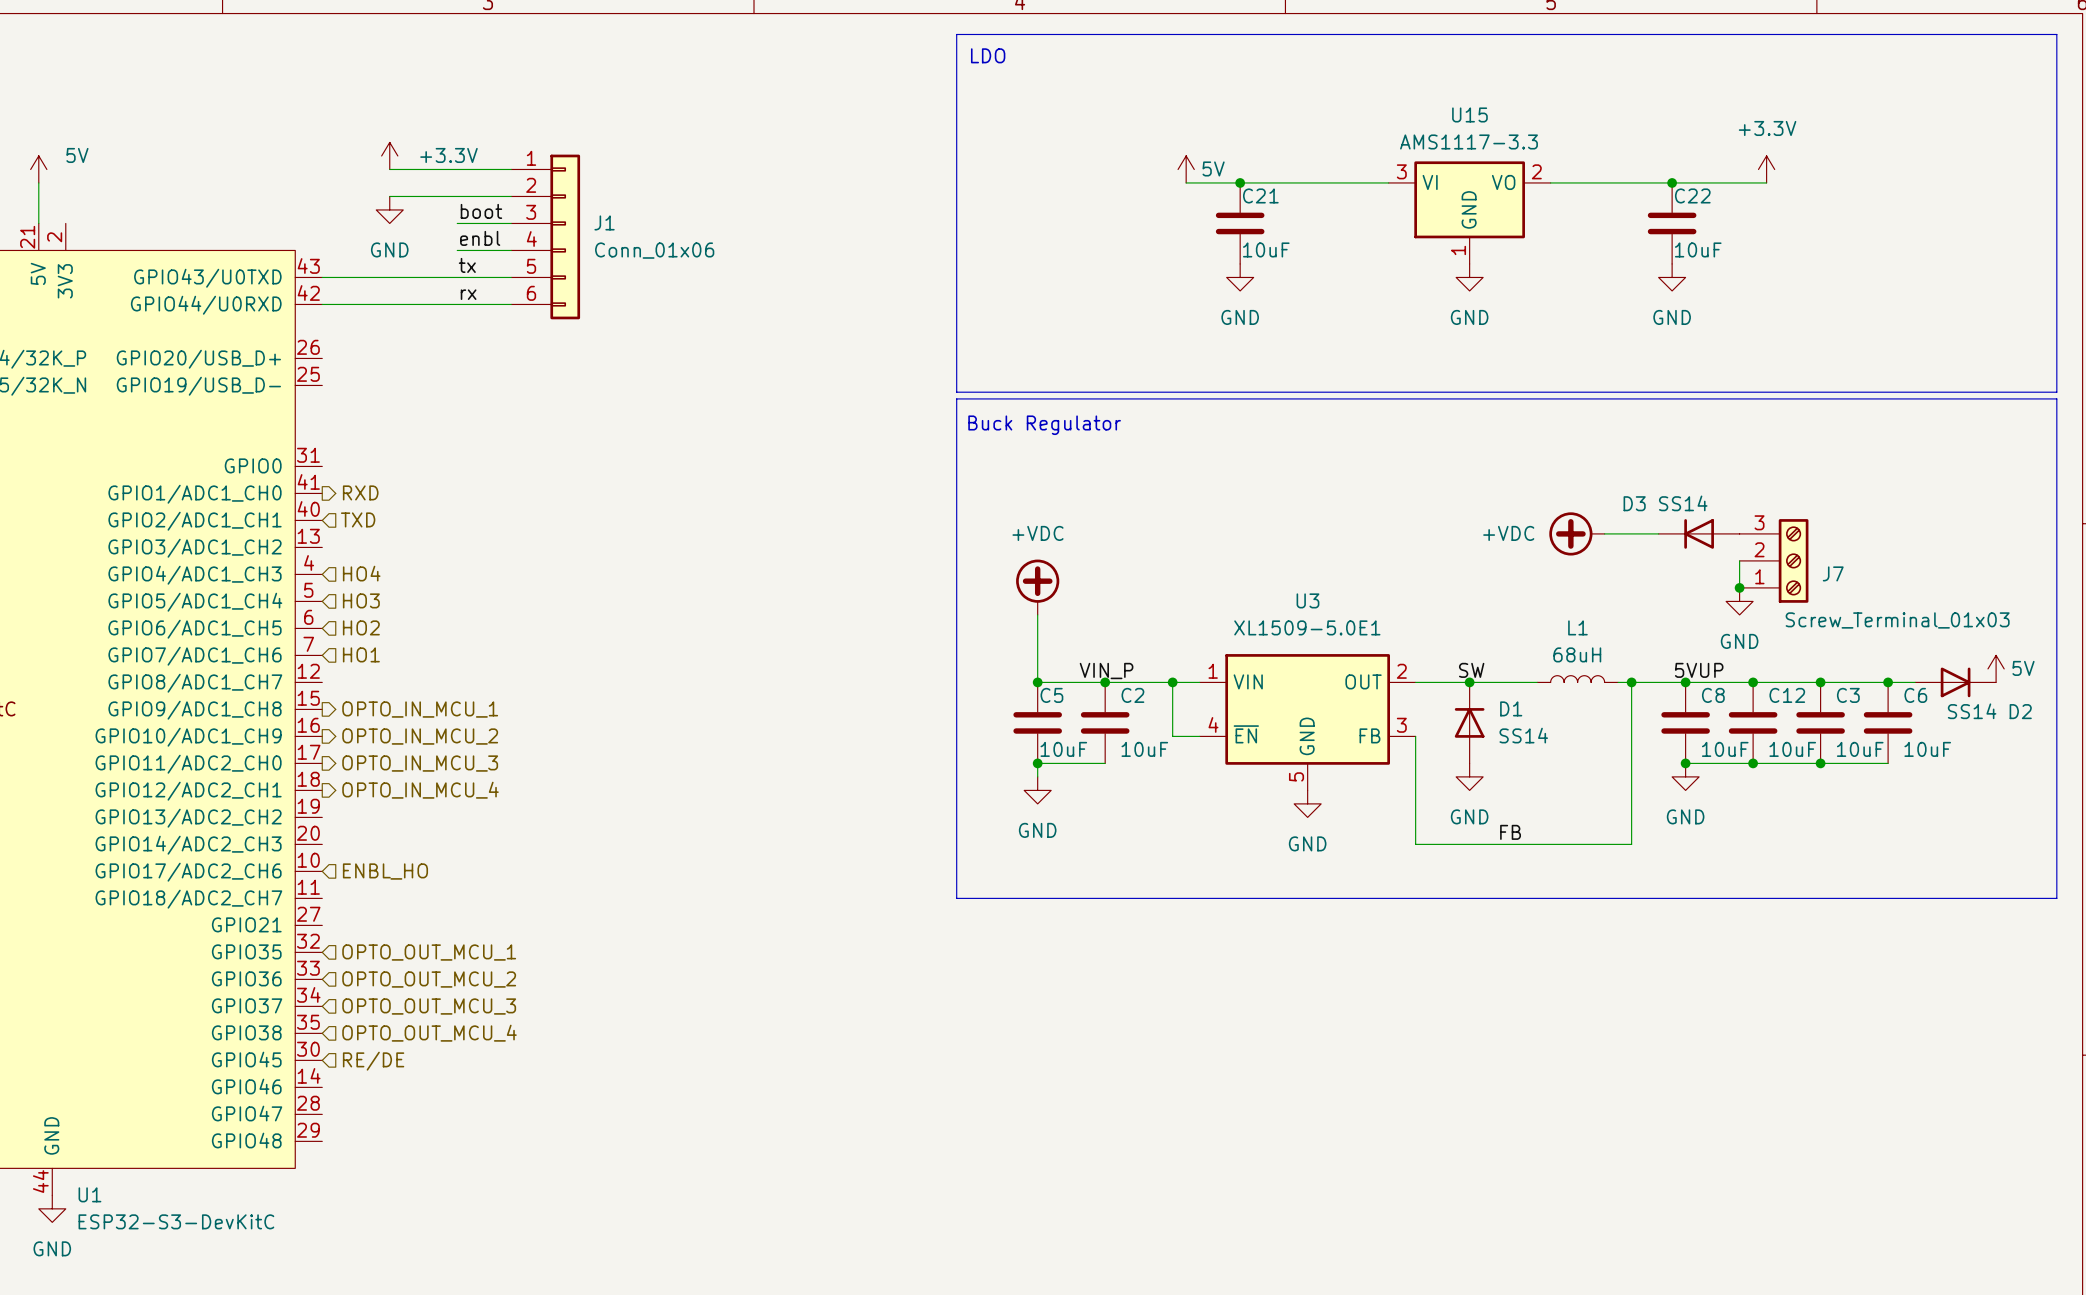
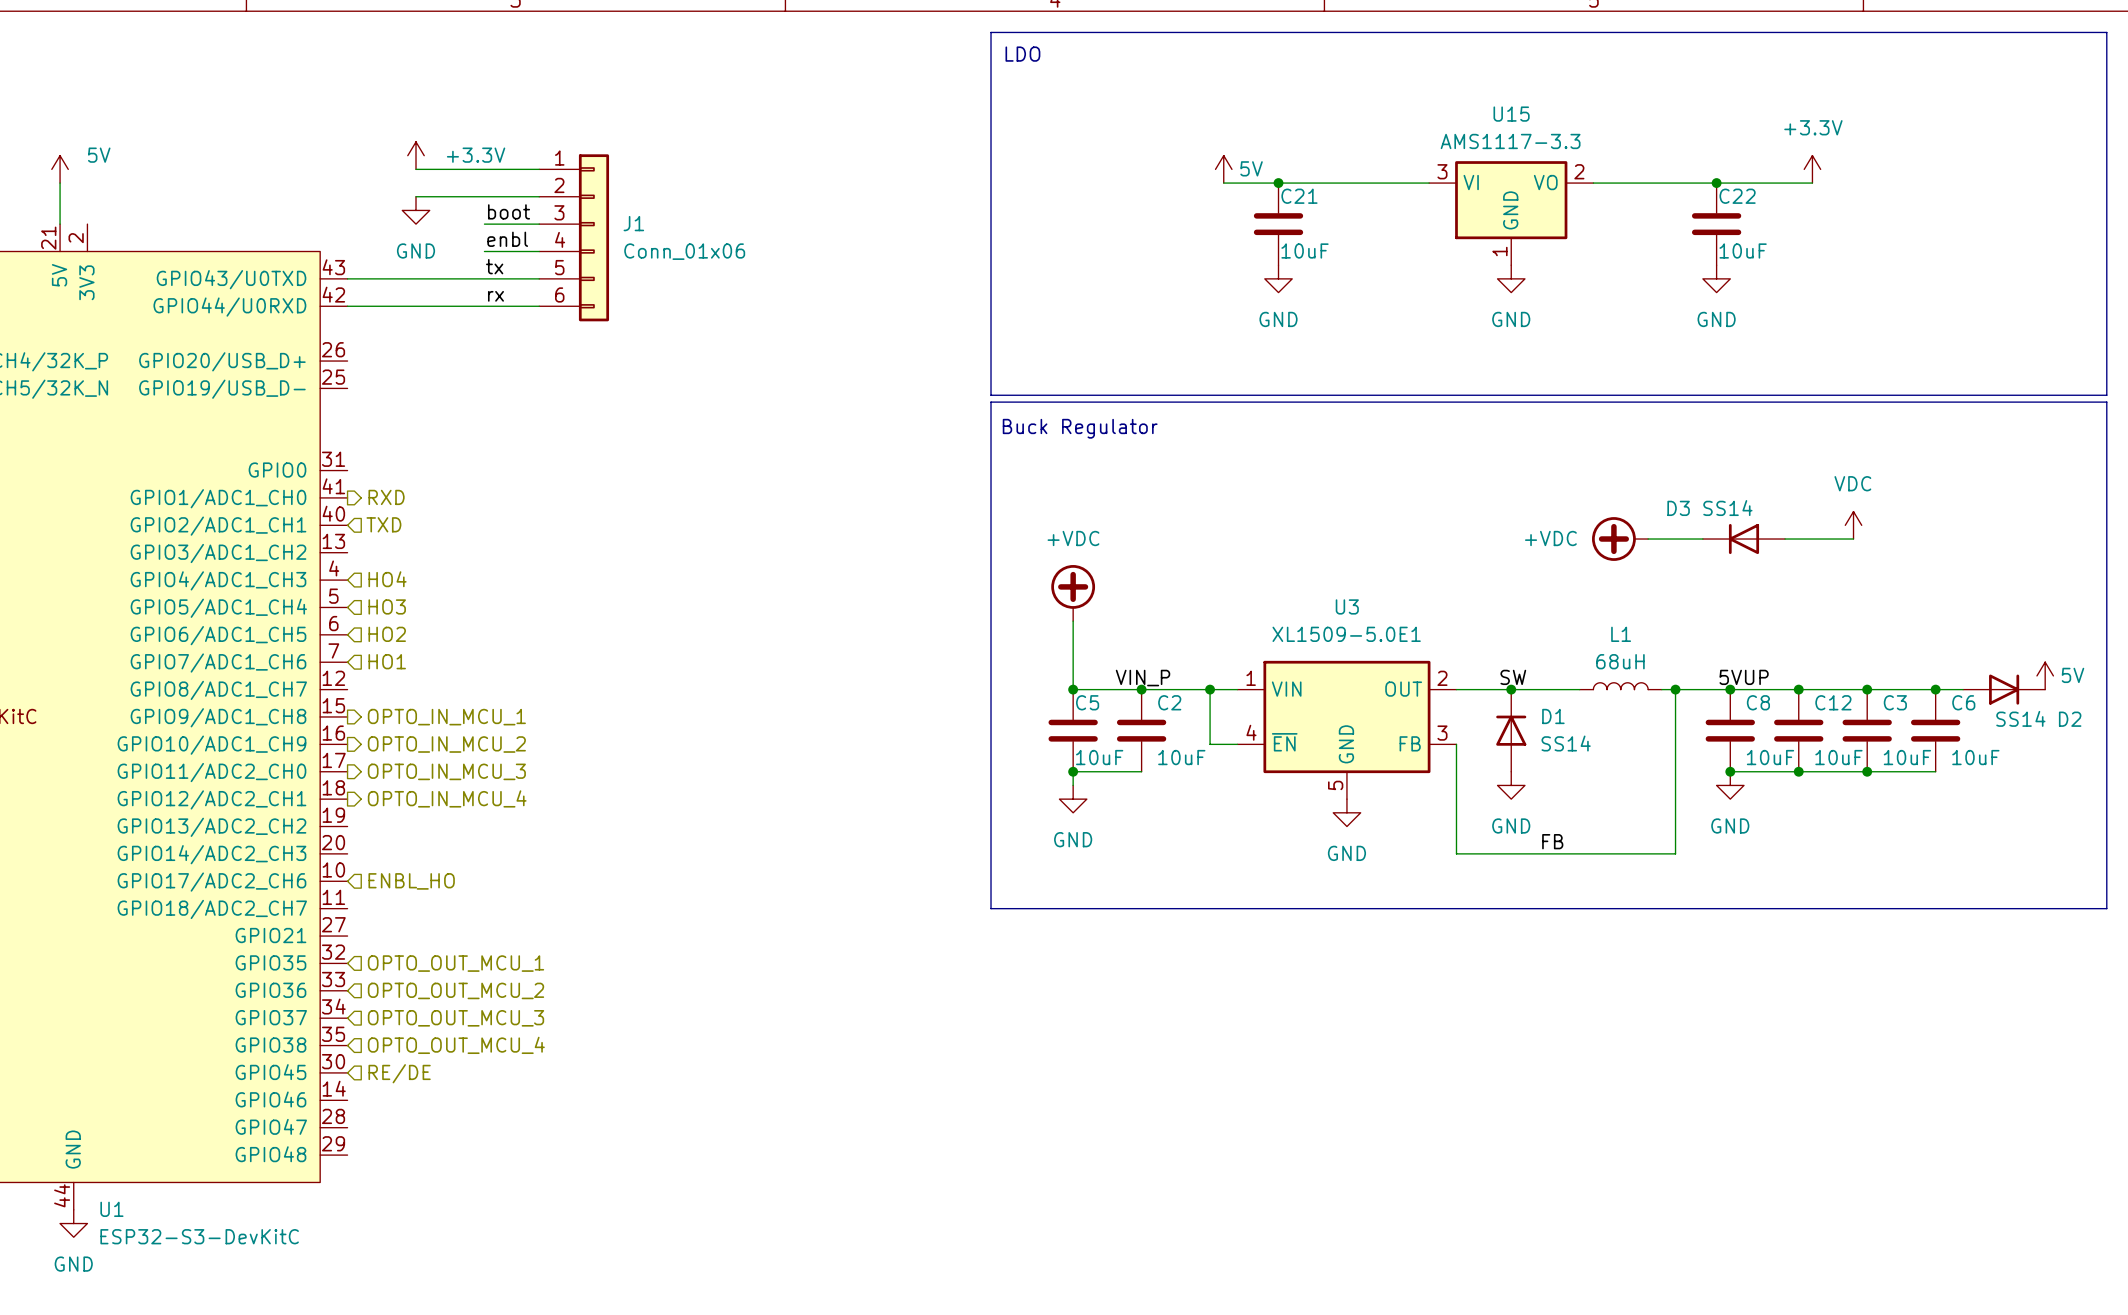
power symbol: none -> VDC (1853, 525)
wire: (1739, 560) (1739, 587) -> none
J7: Screw_Terminal_01x03 (1774, 560) -> none
junction: (1739, 587) -> none
power symbol: GND (1739, 601) -> none

